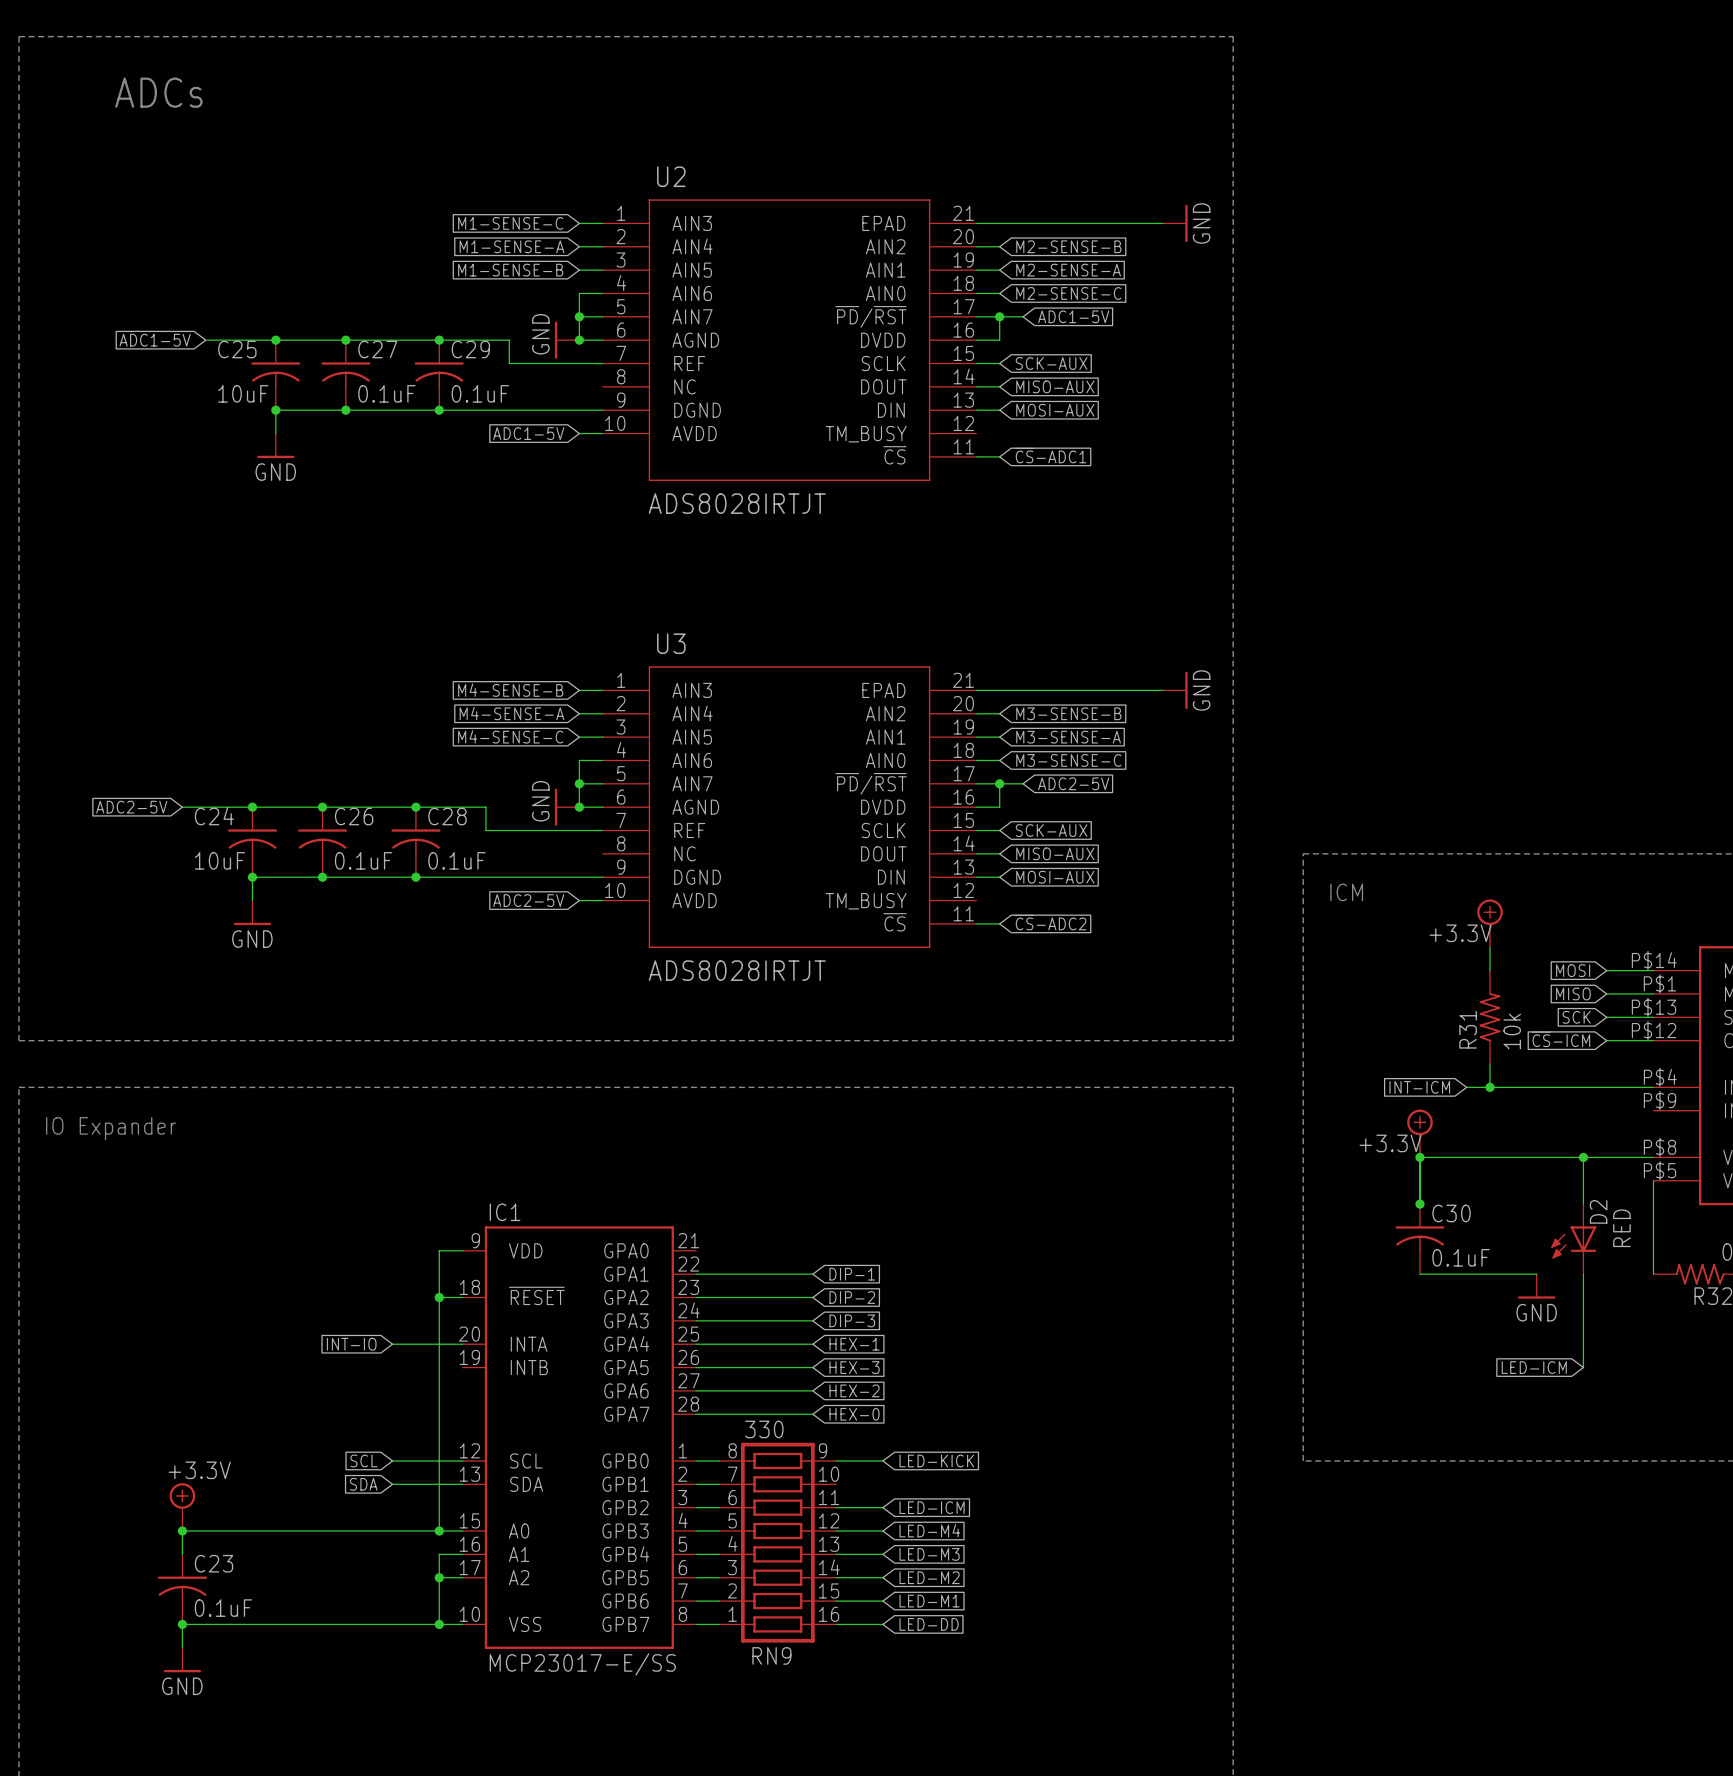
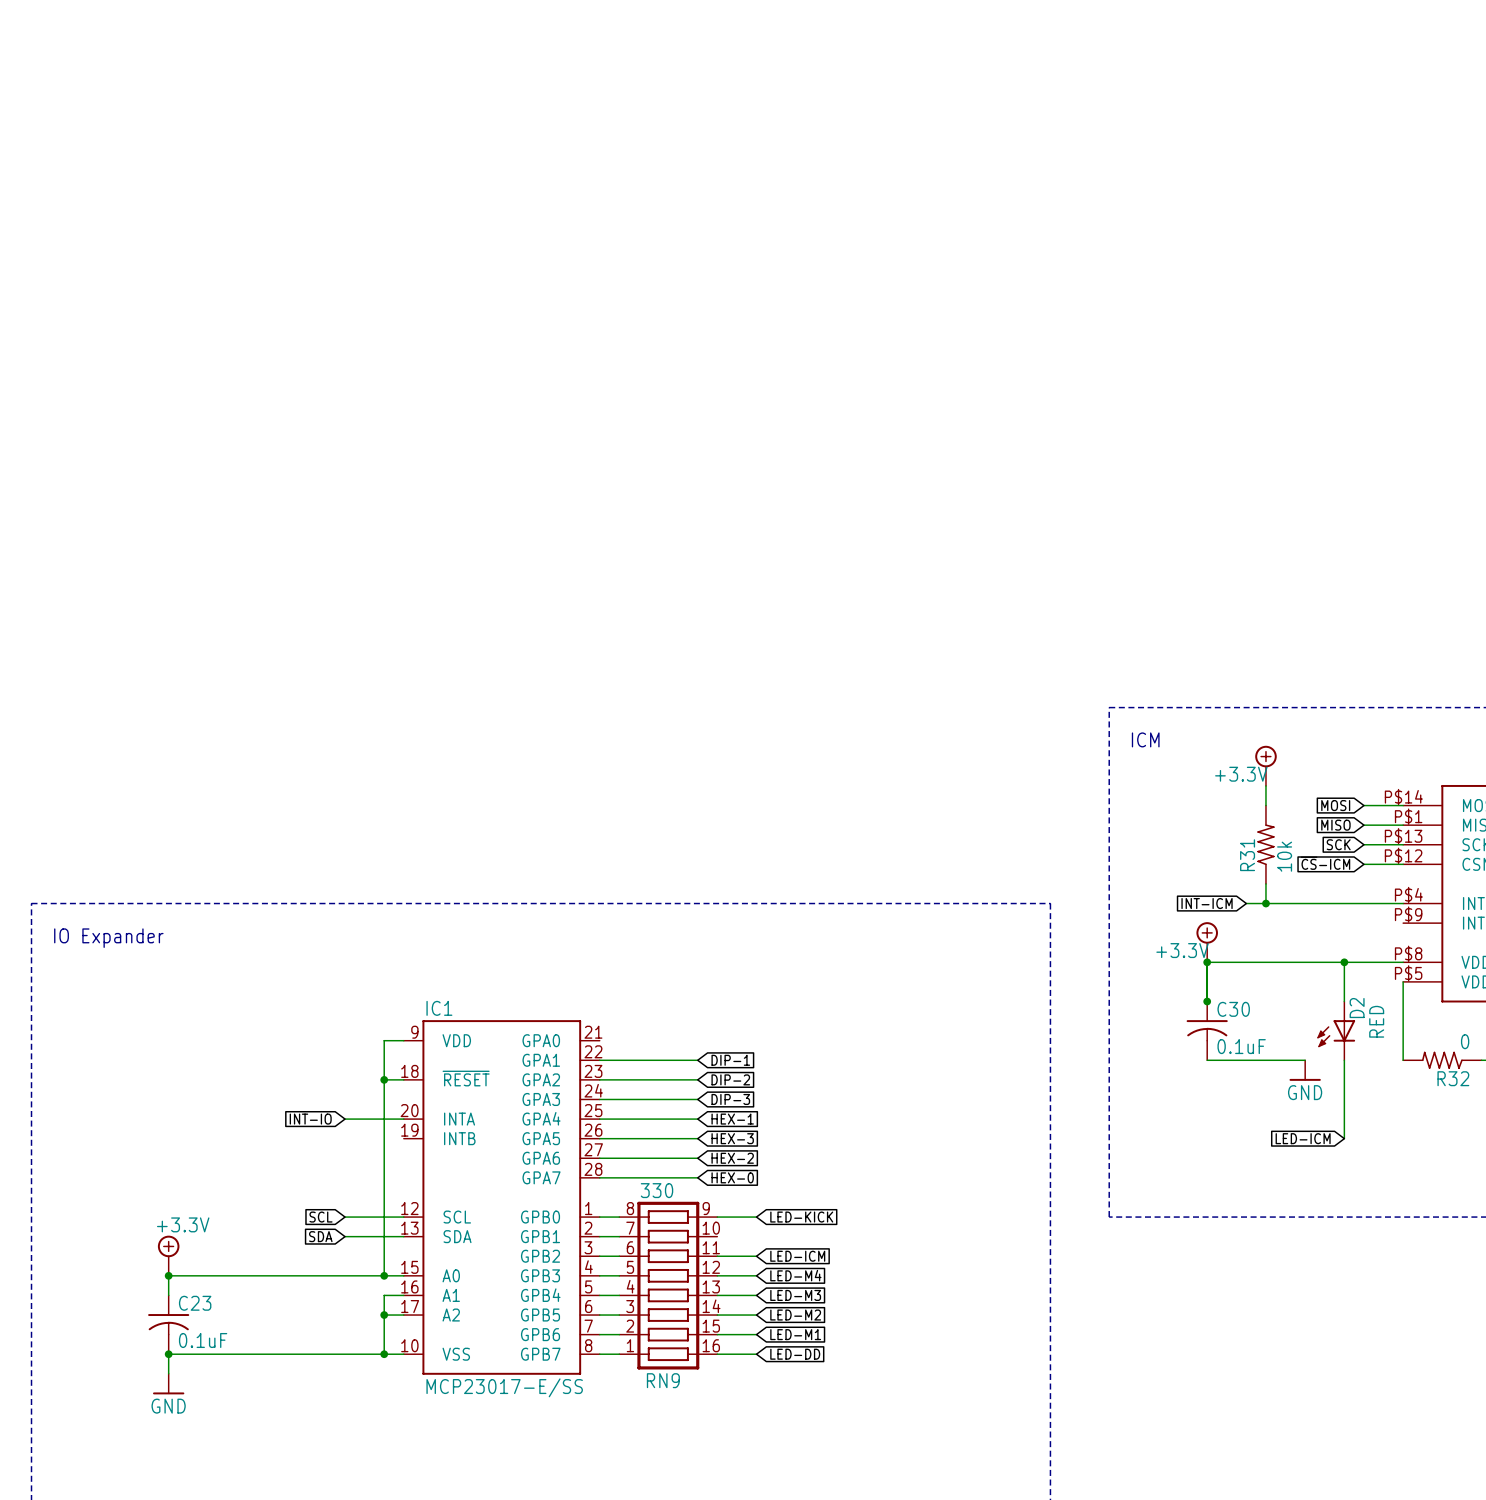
line: (18, 36) (18, 1040) (1233, 1040) (1233, 36) (18, 36) -> none
text: ADCs (158, 92) -> none
global label: M1-SENSE-C (510, 223) -> none
wire: (579, 223) (602, 223) -> none
wire: (976, 223) (1163, 223) -> none
power symbol: GND (1175, 223) -> none
global label: M1-SENSE-A (511, 246) -> none
wire: (579, 246) (602, 246) -> none
wire: (976, 246) (999, 246) -> none
global label: M2-SENSE-B (1068, 246) -> none
global label: M1-SENSE-B (510, 270) -> none
wire: (579, 270) (602, 270) -> none
wire: (976, 270) (999, 270) -> none
global label: M2-SENSE-A (1068, 270) -> none
wire: (602, 293) (579, 293) (579, 340) (602, 340) -> none
wire: (976, 293) (999, 293) -> none
global label: M2-SENSE-C (1068, 293) -> none
wire: (579, 316) (602, 316) -> none
junction: (579, 316) -> none
wire: (976, 316) (1023, 316) -> none
wire: (999, 316) (999, 340) (976, 340) -> none
junction: (999, 316) -> none
global label: ADC1-5V (1073, 316) -> none
global label: ADC1-5V (155, 340) -> none
wire: (205, 340) (509, 340) (509, 363) (602, 363) -> none
junction: (275, 340) -> none
junction: (345, 340) -> none
junction: (439, 340) -> none
power symbol: GND (567, 340) -> none
junction: (579, 340) -> none
U2: ADS8028IRTJT (789, 340) -> none
wire: (976, 363) (999, 363) -> none
global label: SCK-AUX (1051, 363) -> none
C25: 10uF (275, 375) -> none
C27: 0.1uF (345, 375) -> none
C29: 0.1uF (439, 375) -> none
wire: (976, 386) (999, 386) -> none
global label: MISO-AUX (1055, 386) -> none
junction: (275, 410) -> none
junction: (345, 410) -> none
junction: (439, 410) -> none
wire: (602, 410) (275, 410) (275, 433) -> none
wire: (976, 410) (999, 410) -> none
global label: MOSI-AUX (1055, 410) -> none
global label: ADC1-5V (528, 433) -> none
wire: (579, 433) (602, 433) -> none
power symbol: GND (275, 445) -> none
global label: ~{CS}-ADC1 (1050, 455) -> none
wire: (976, 456) (999, 456) -> none
global label: M4-SENSE-B (510, 690) -> none
wire: (579, 690) (602, 690) -> none
wire: (976, 690) (1163, 690) -> none
power symbol: GND (1175, 690) -> none
global label: M4-SENSE-A (511, 713) -> none
wire: (579, 713) (602, 713) -> none
wire: (976, 713) (999, 713) -> none
global label: M3-SENSE-B (1068, 713) -> none
global label: M4-SENSE-C (510, 736) -> none
wire: (579, 737) (602, 737) -> none
wire: (976, 737) (999, 737) -> none
global label: M3-SENSE-A (1068, 737) -> none
wire: (602, 760) (579, 760) (579, 807) (602, 807) -> none
wire: (976, 760) (999, 760) -> none
global label: M3-SENSE-C (1068, 760) -> none
wire: (579, 783) (602, 783) -> none
junction: (579, 783) -> none
wire: (976, 783) (1023, 783) -> none
wire: (999, 783) (999, 807) (976, 807) -> none
junction: (999, 783) -> none
global label: ADC2-5V (1073, 783) -> none
global label: ADC2-5V (131, 807) -> none
wire: (182, 807) (485, 807) (485, 830) (602, 830) -> none
junction: (252, 807) -> none
junction: (322, 807) -> none
junction: (415, 807) -> none
power symbol: GND (567, 807) -> none
junction: (579, 807) -> none
U3: ADS8028IRTJT (789, 807) -> none
wire: (976, 830) (999, 830) -> none
global label: SCK-AUX (1051, 830) -> none
C24: 10uF (252, 842) -> none
C26: 0.1uF (322, 842) -> none
C28: 0.1uF (415, 842) -> none
wire: (976, 853) (999, 853) -> none
global label: MISO-AUX (1055, 853) -> none
junction: (252, 877) -> none
junction: (322, 877) -> none
junction: (415, 877) -> none
wire: (602, 877) (252, 877) (252, 900) -> none
wire: (976, 877) (999, 877) -> none
global label: MOSI-AUX (1055, 877) -> none
global label: ADC2-5V (528, 900) -> none
wire: (579, 900) (602, 900) -> none
power symbol: GND (252, 912) -> none
global label: ~{CS}-ADC2 (1050, 922) -> none
wire: (976, 923) (999, 923) -> none

